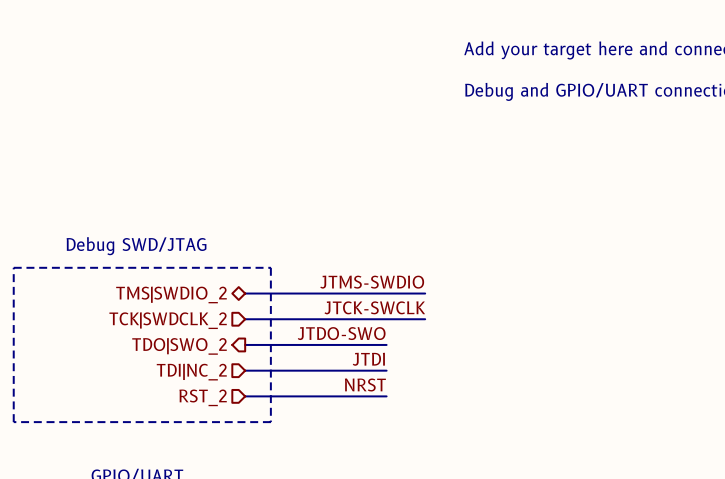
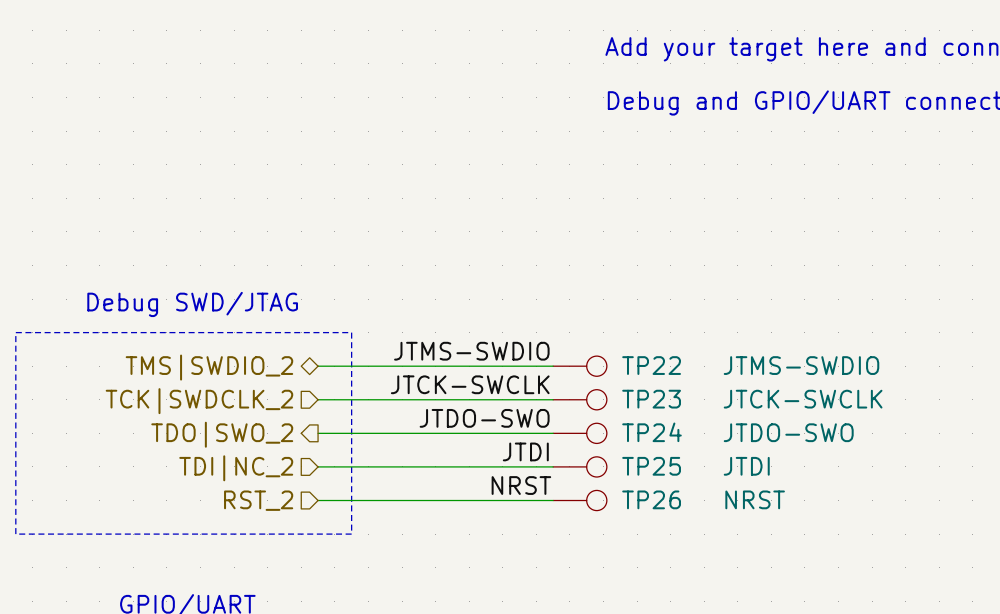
TP22: none -> JTMS-SWDIO (579, 366)
TP23: none -> JTCK-SWCLK (579, 399)
label position: JTDO-SWO (341, 333) -> JTDO-SWO (484, 418)
wire: none -> (502, 433) (553, 433)
TP24: none -> JTDO-SWO (579, 433)
label position: JTDI (368, 359) -> JTDI (525, 451)
wire: none -> (502, 466) (553, 466)
TP25: none -> JTDI (579, 466)
label position: NRST (365, 384) -> NRST (521, 485)
wire: none -> (502, 500) (553, 500)
TP26: none -> NRST (579, 500)

